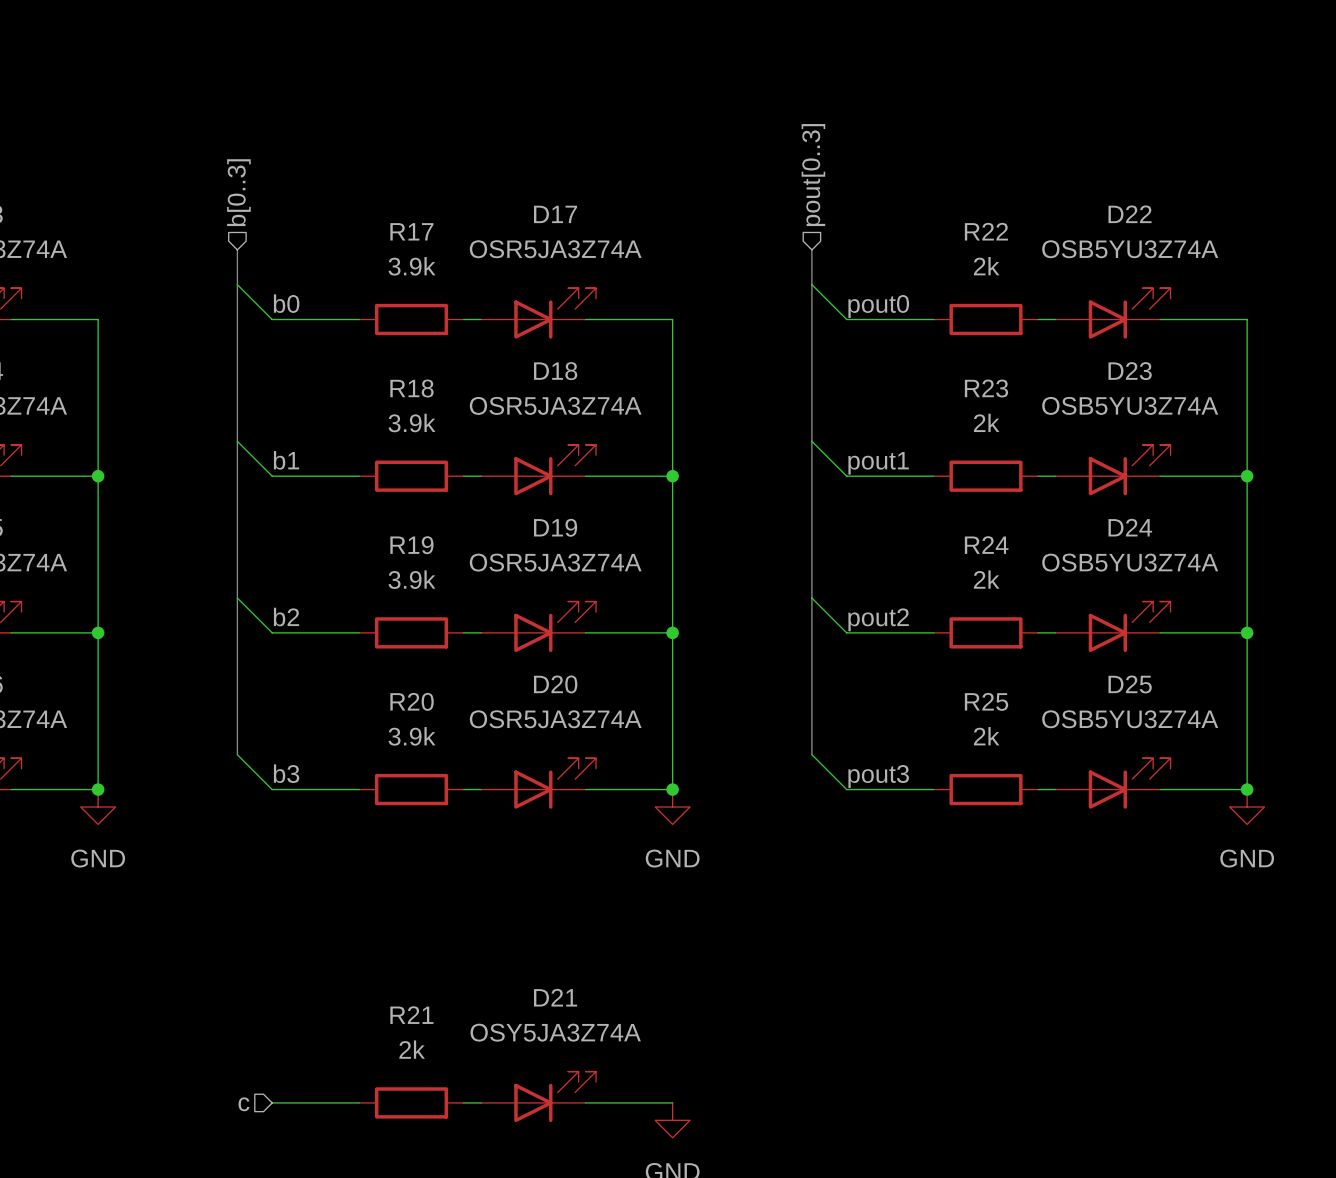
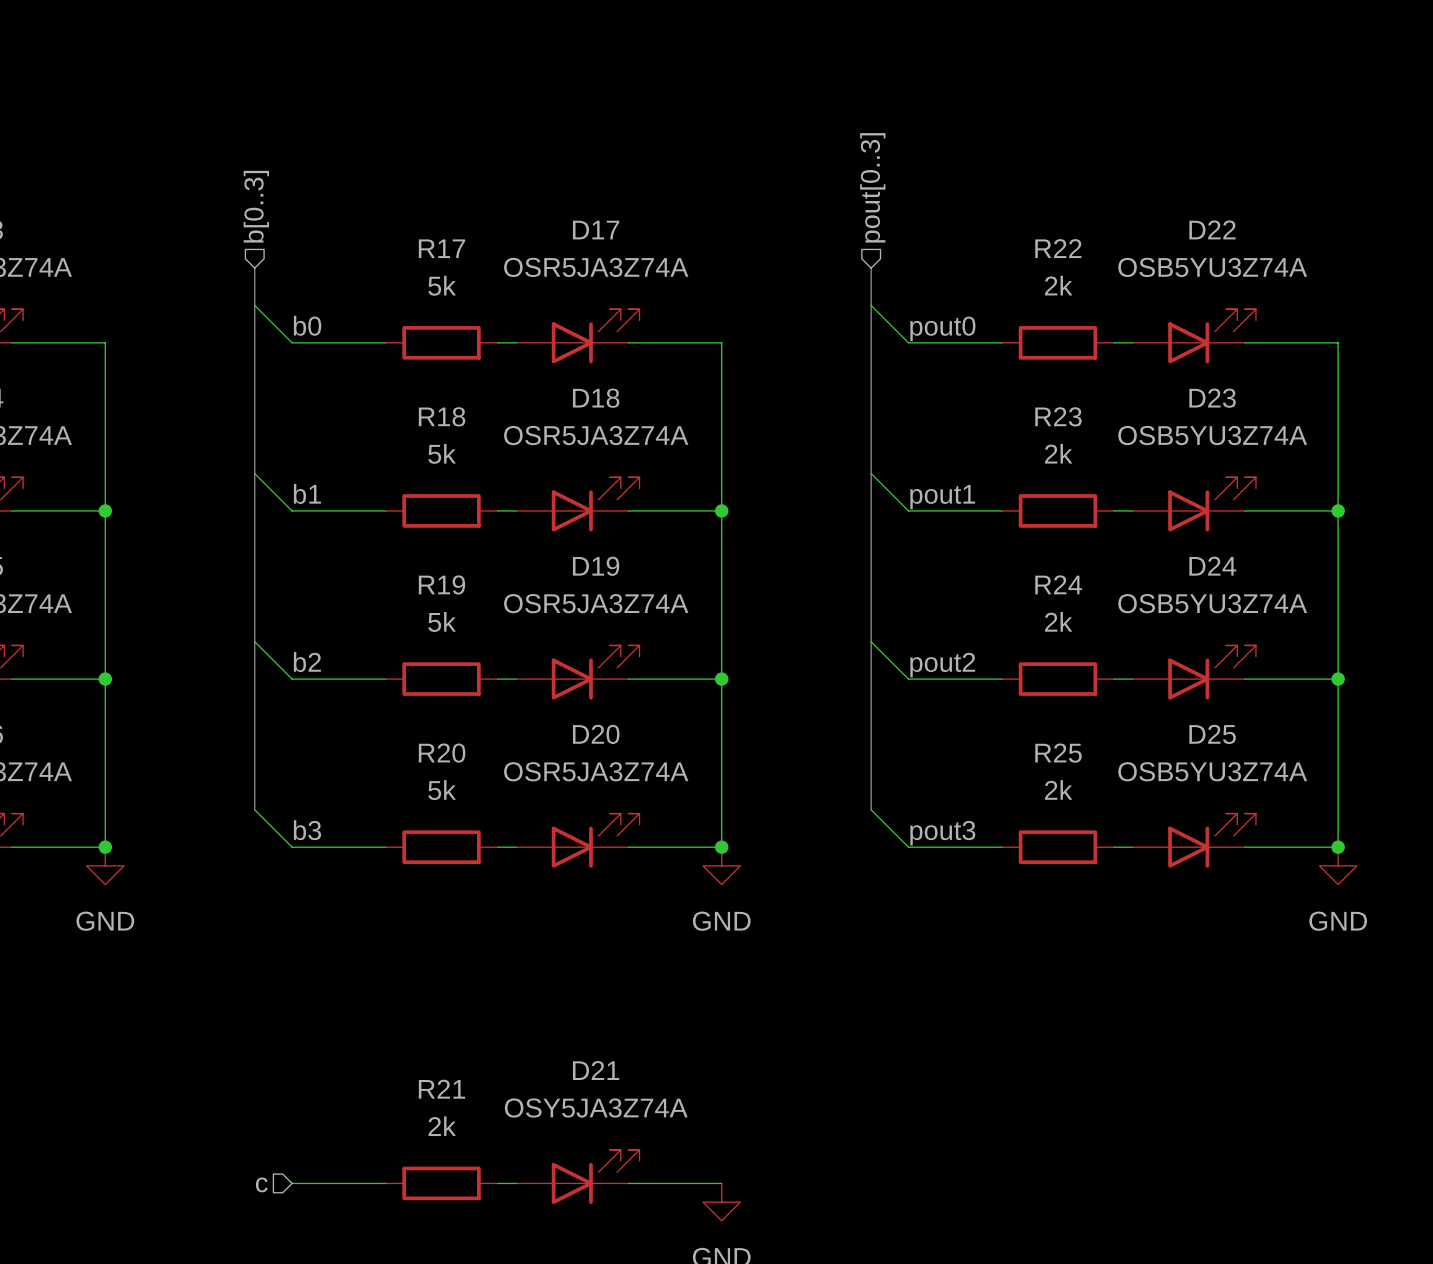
R17 value: 3.9k (412, 266) -> 5k (442, 285)
R18 value: 3.9k (412, 422) -> 5k (442, 453)
R19 value: 3.9k (412, 579) -> 5k (442, 621)
R20 value: 3.9k (412, 736) -> 5k (442, 790)

